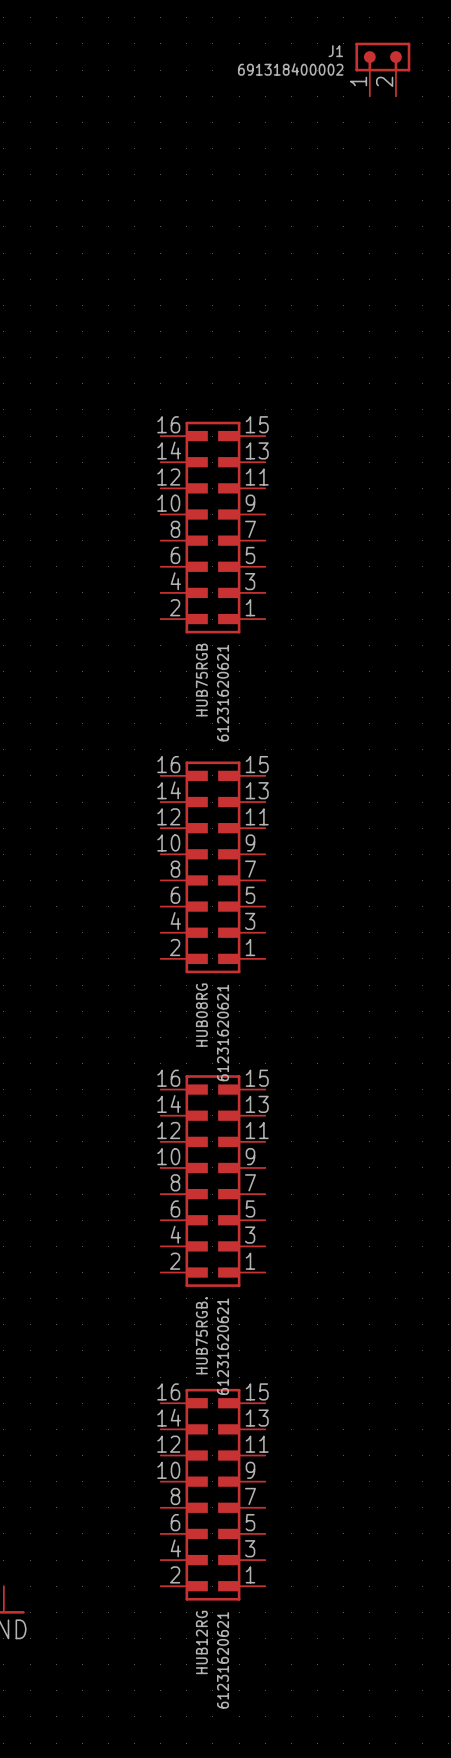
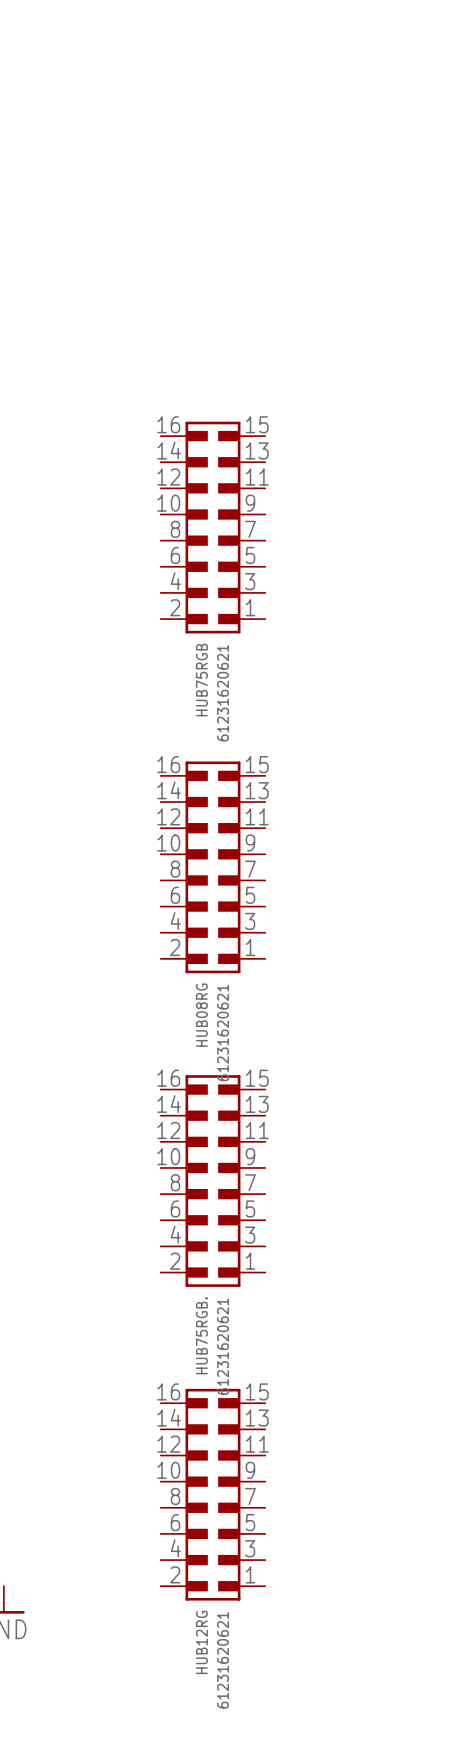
J1: 691318400002 (382, 69) -> none

